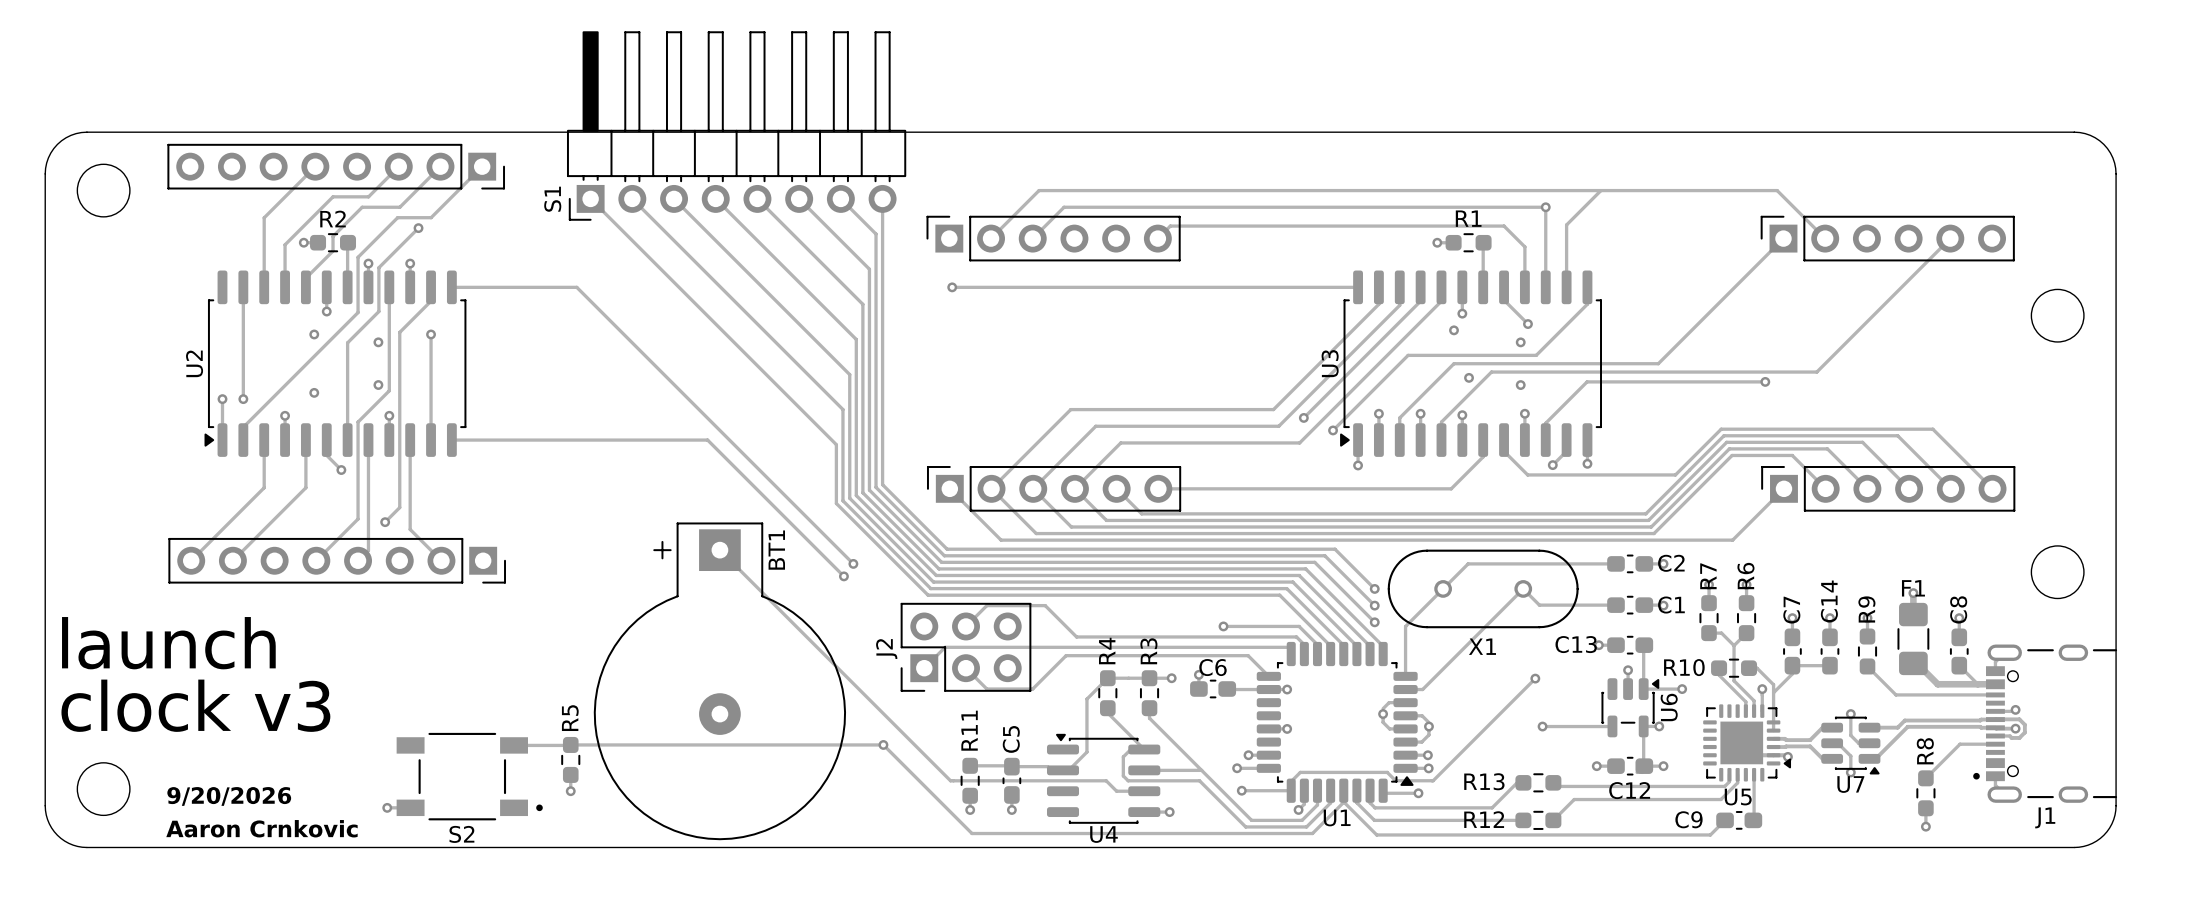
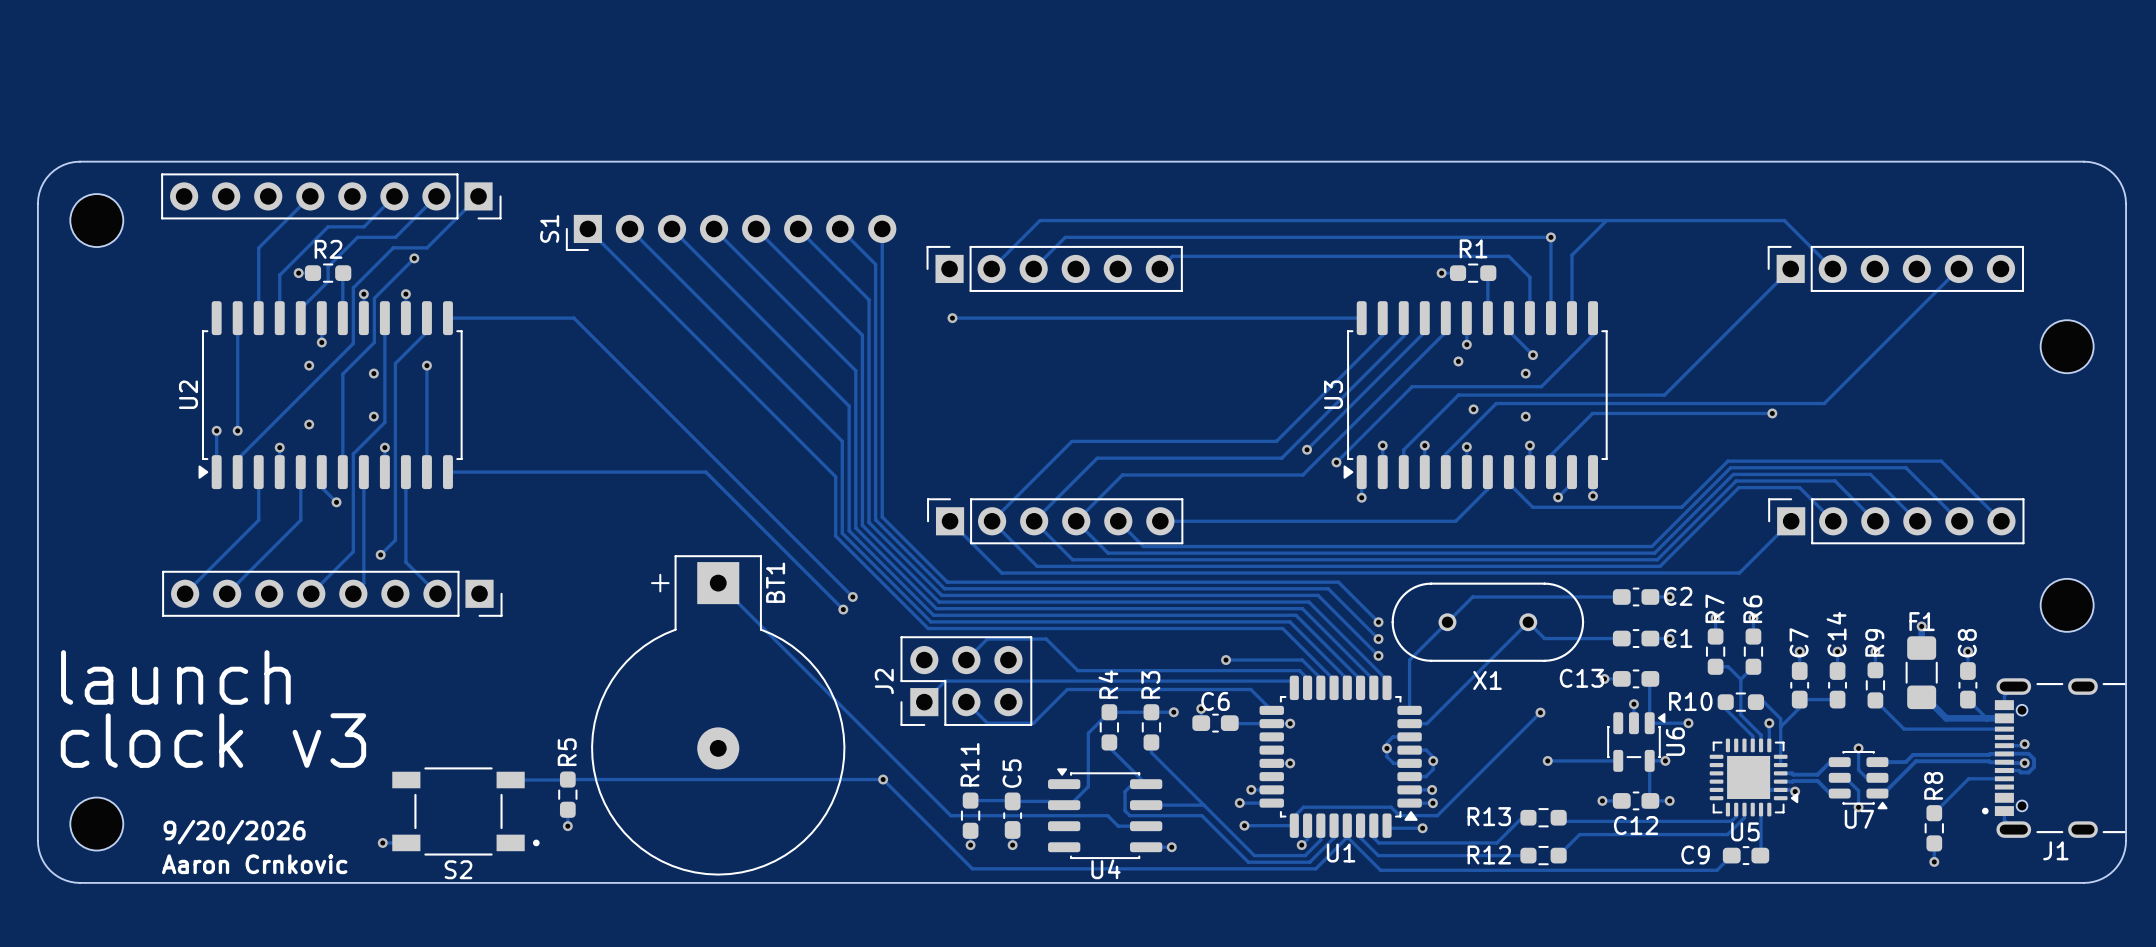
S1 footprint: [566, 31, 907, 221] -> [565, 214, 897, 251]

